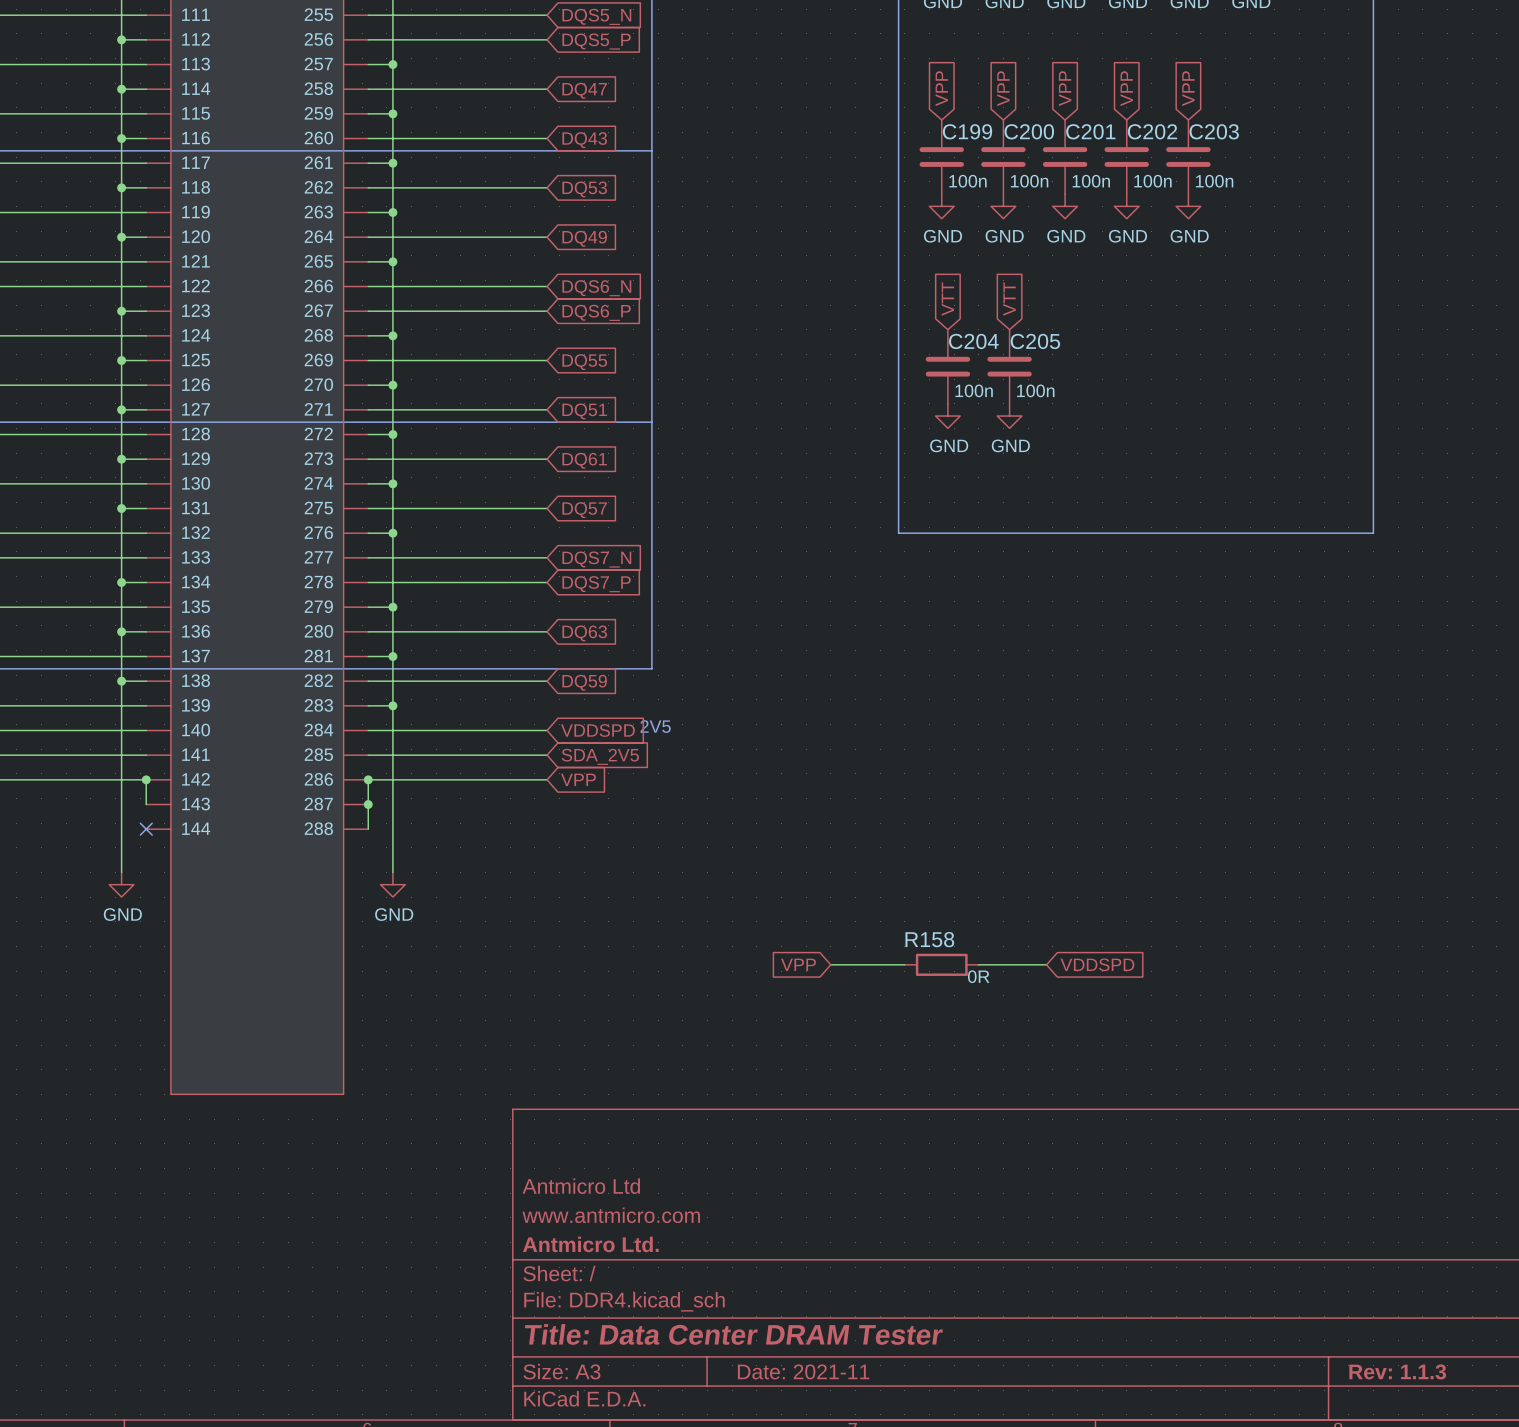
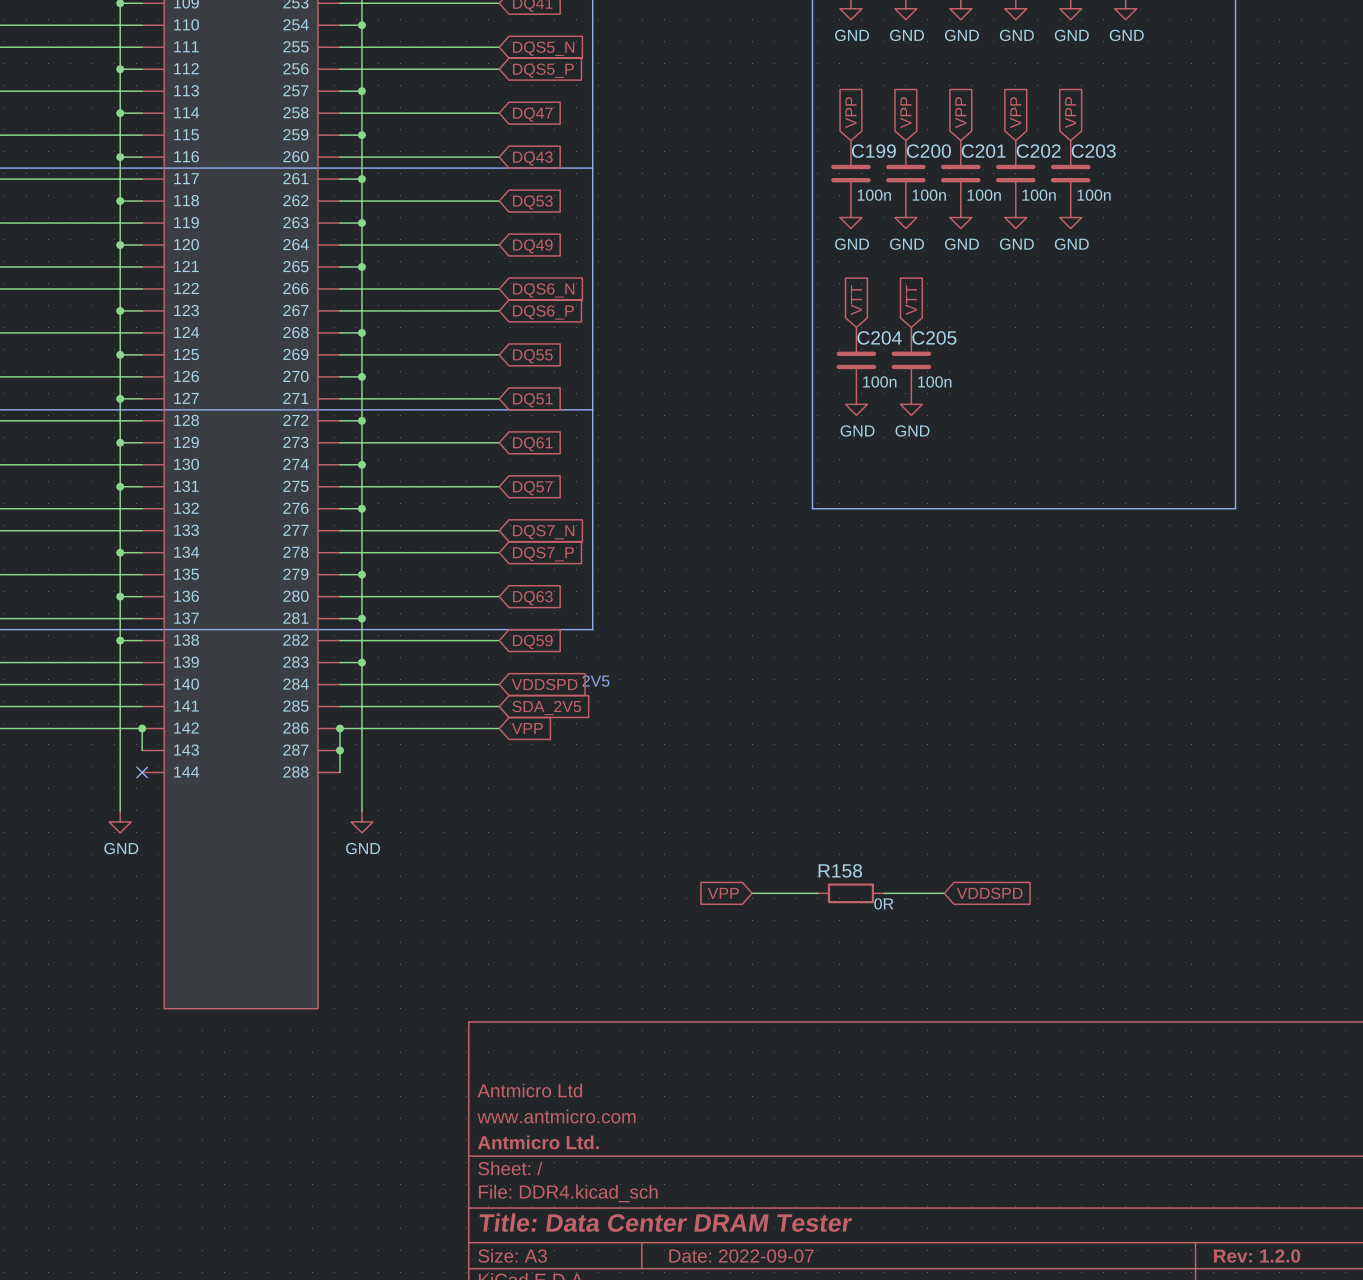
title block: Date: 2021-11 (803, 1371) -> Date: 2022-09-07 (741, 1256)
title block: Rev: 1.1.3 (1397, 1371) -> Rev: 1.2.0 (1257, 1256)

